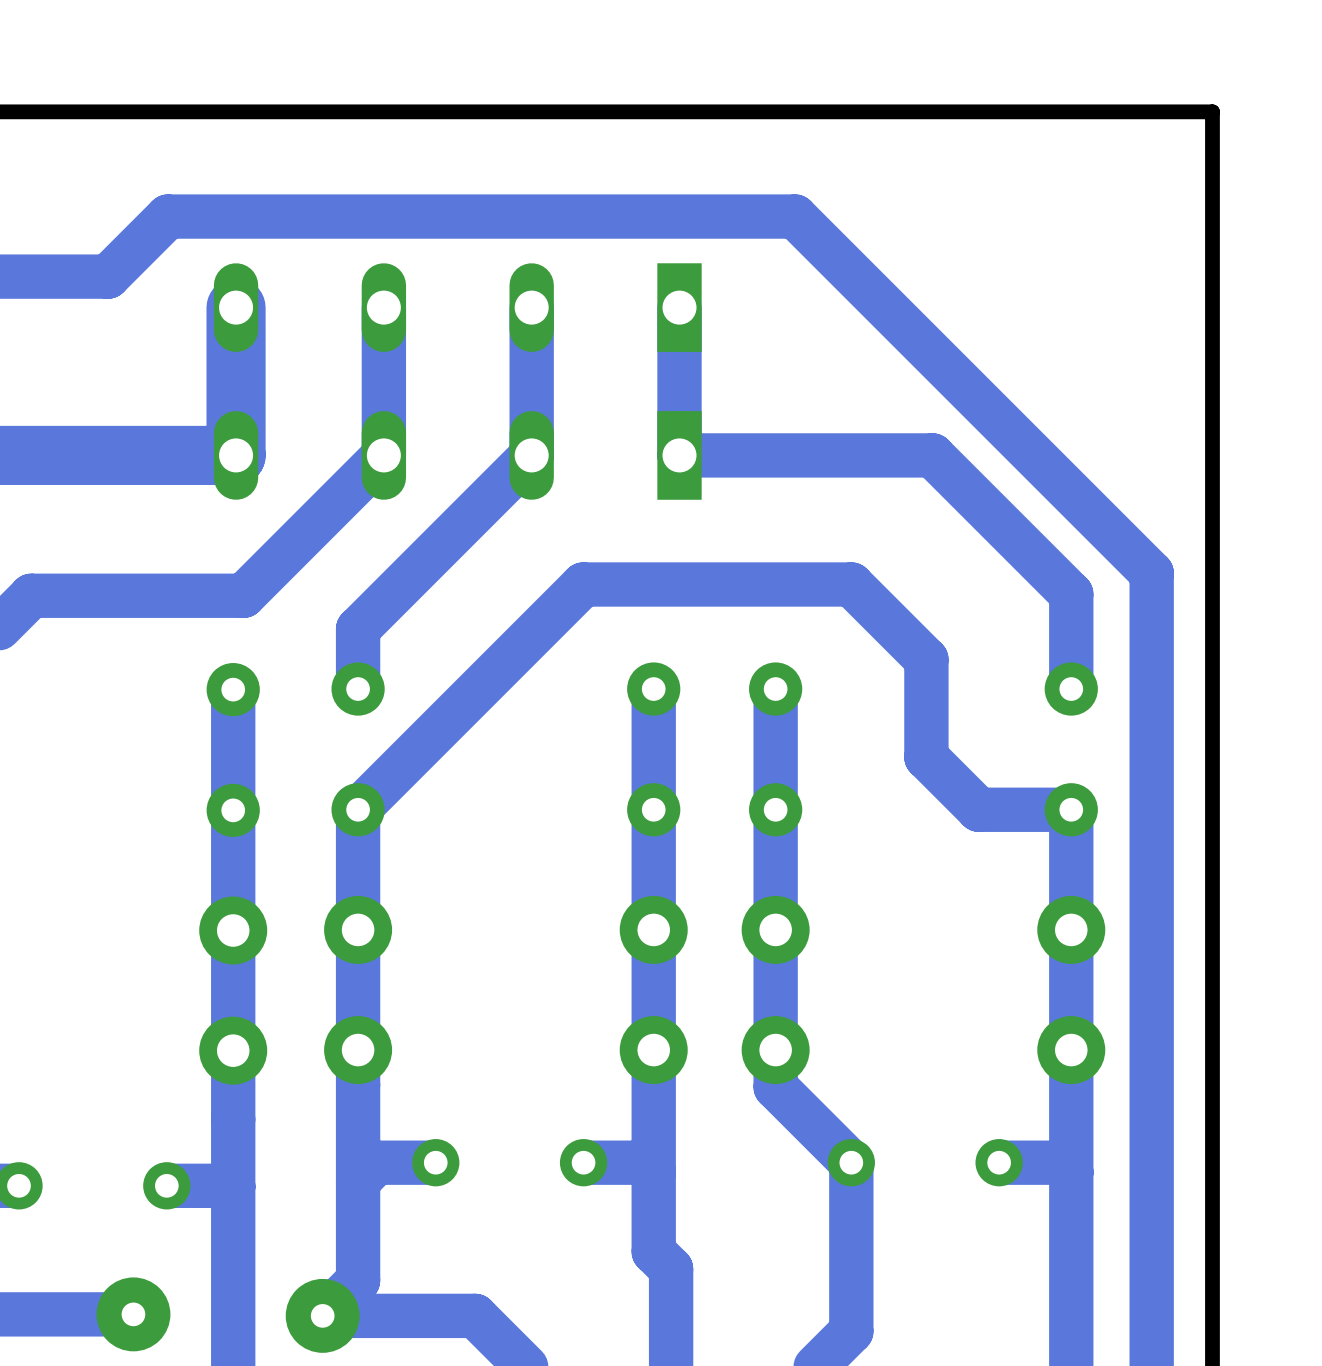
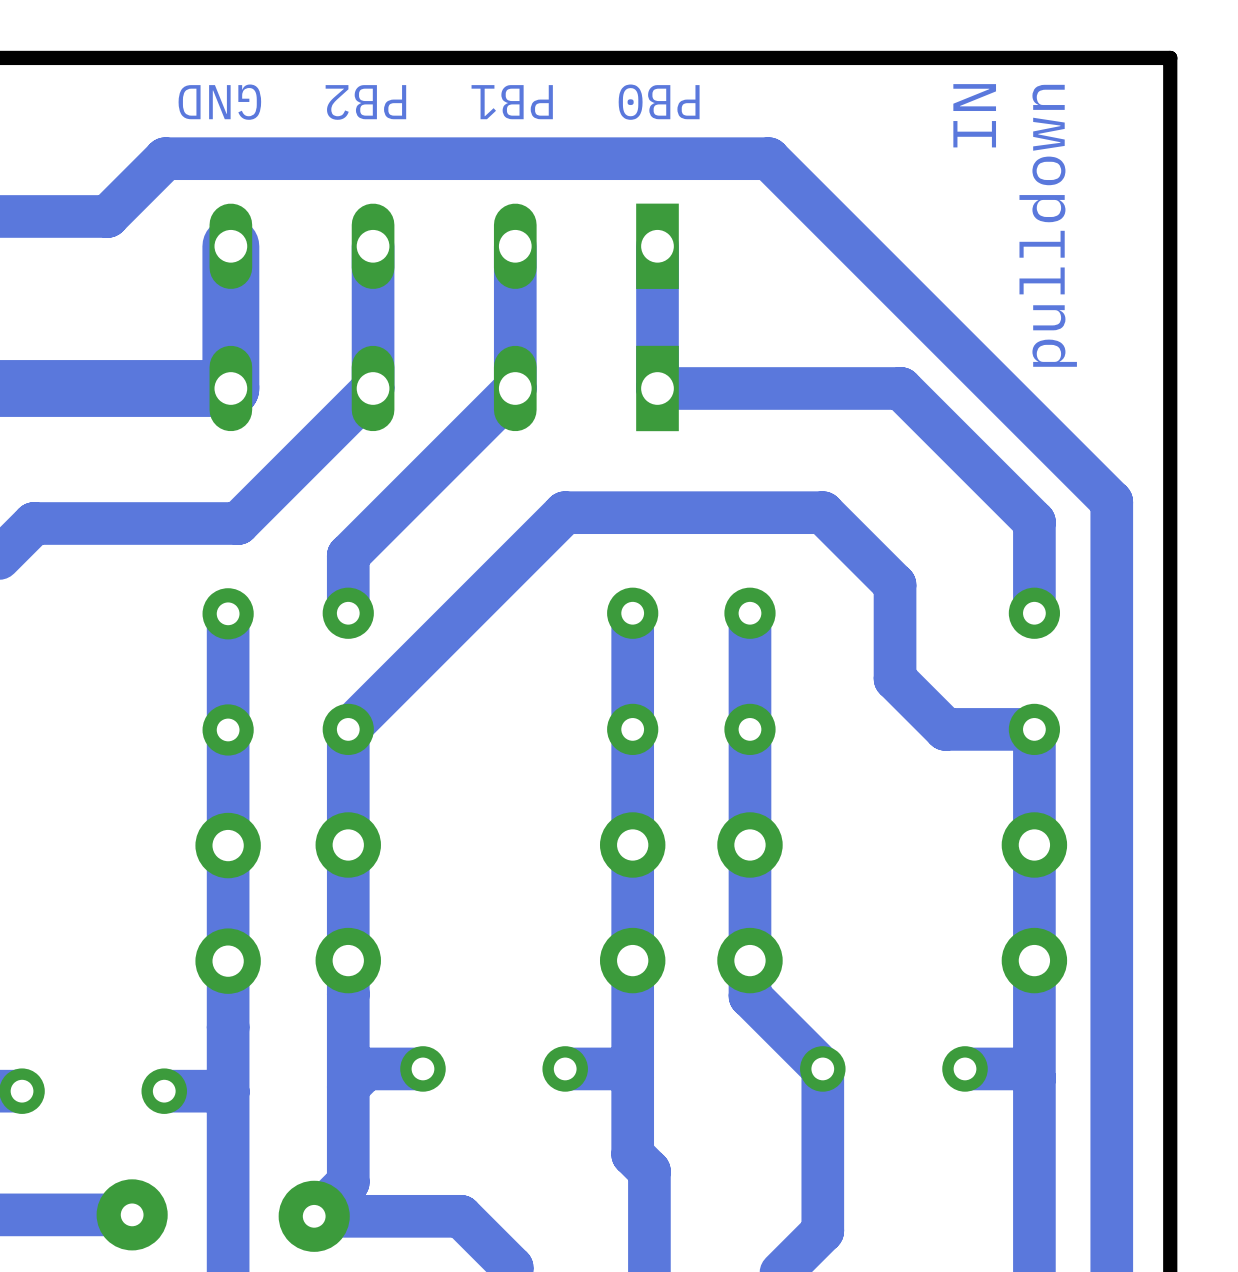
text: none -> PB0 PB1 PB2 GND (439, 102)
text: none -> IN (974, 115)
text: none -> pulldown (1048, 225)

